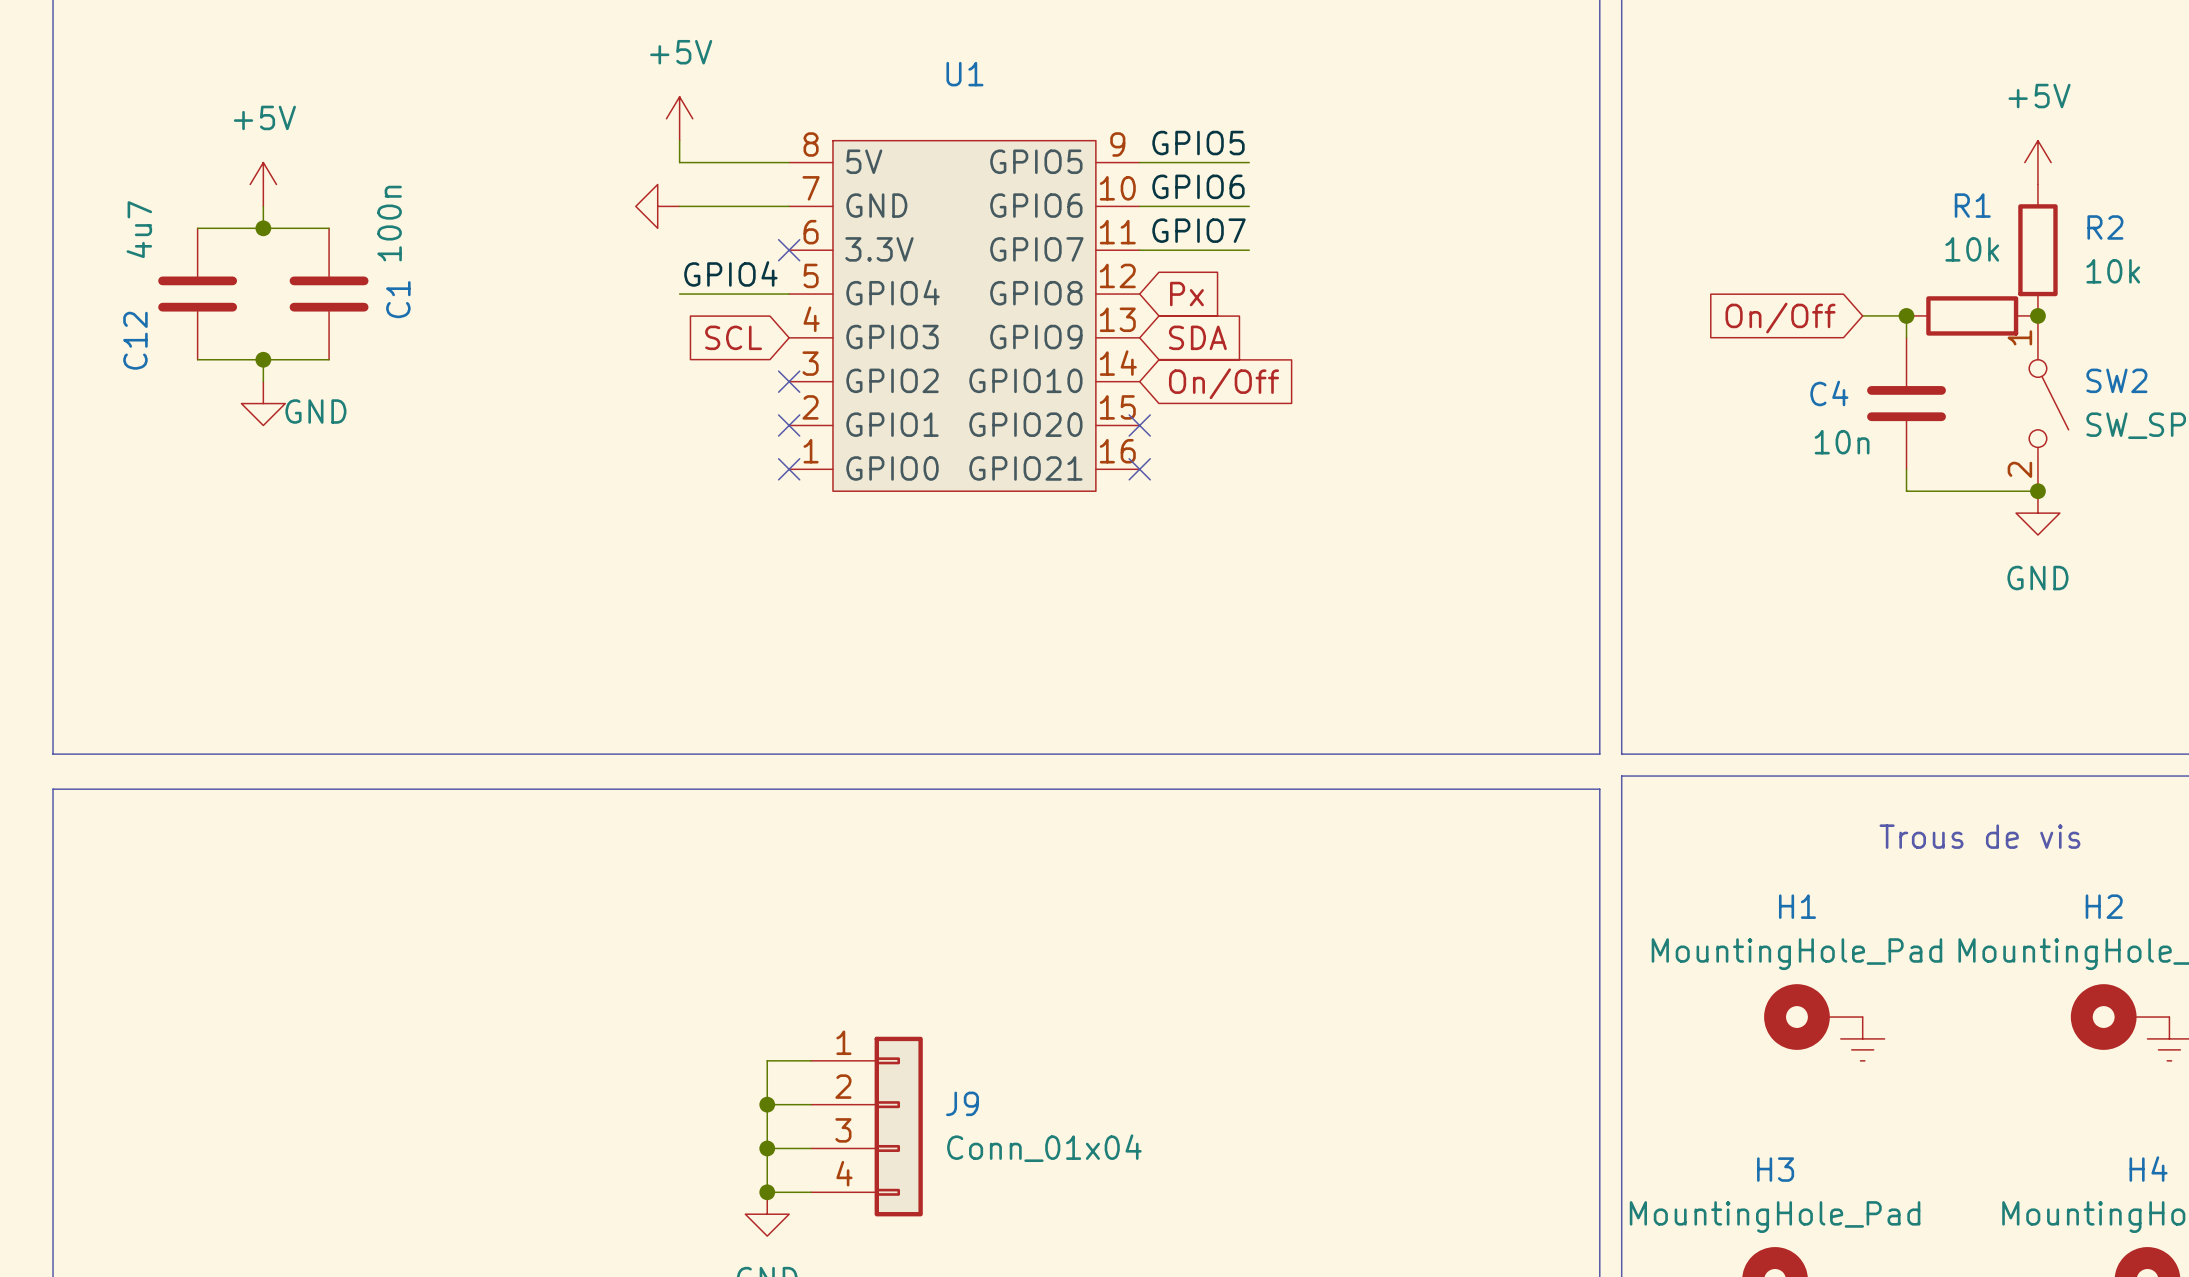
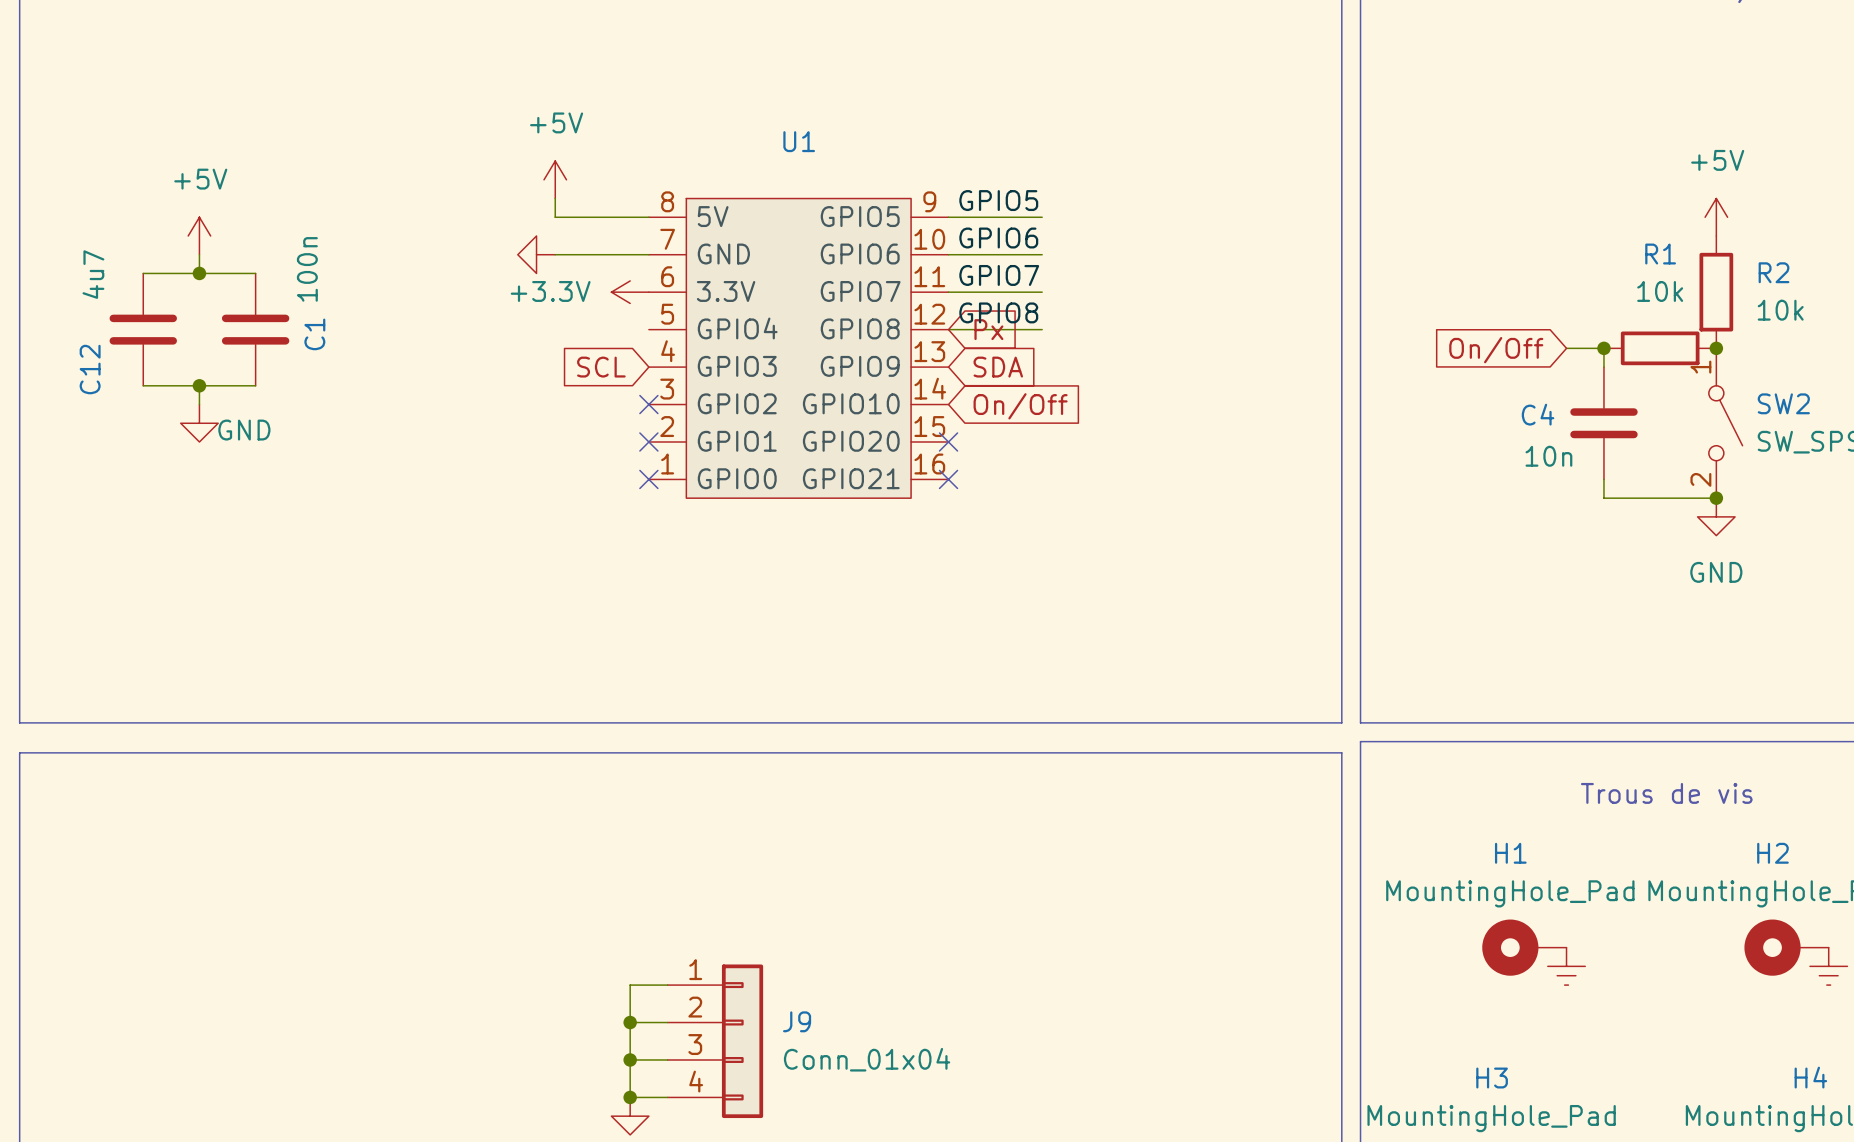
power symbol: none -> +3.3V (630, 292)
no-connect mark: (789, 250) -> none
label: GPIO4 (730, 273) -> none
label: none -> GPIO8 (998, 312)
wire: (679, 294) (789, 294) -> none
wire: none -> (948, 329) (1042, 329)

